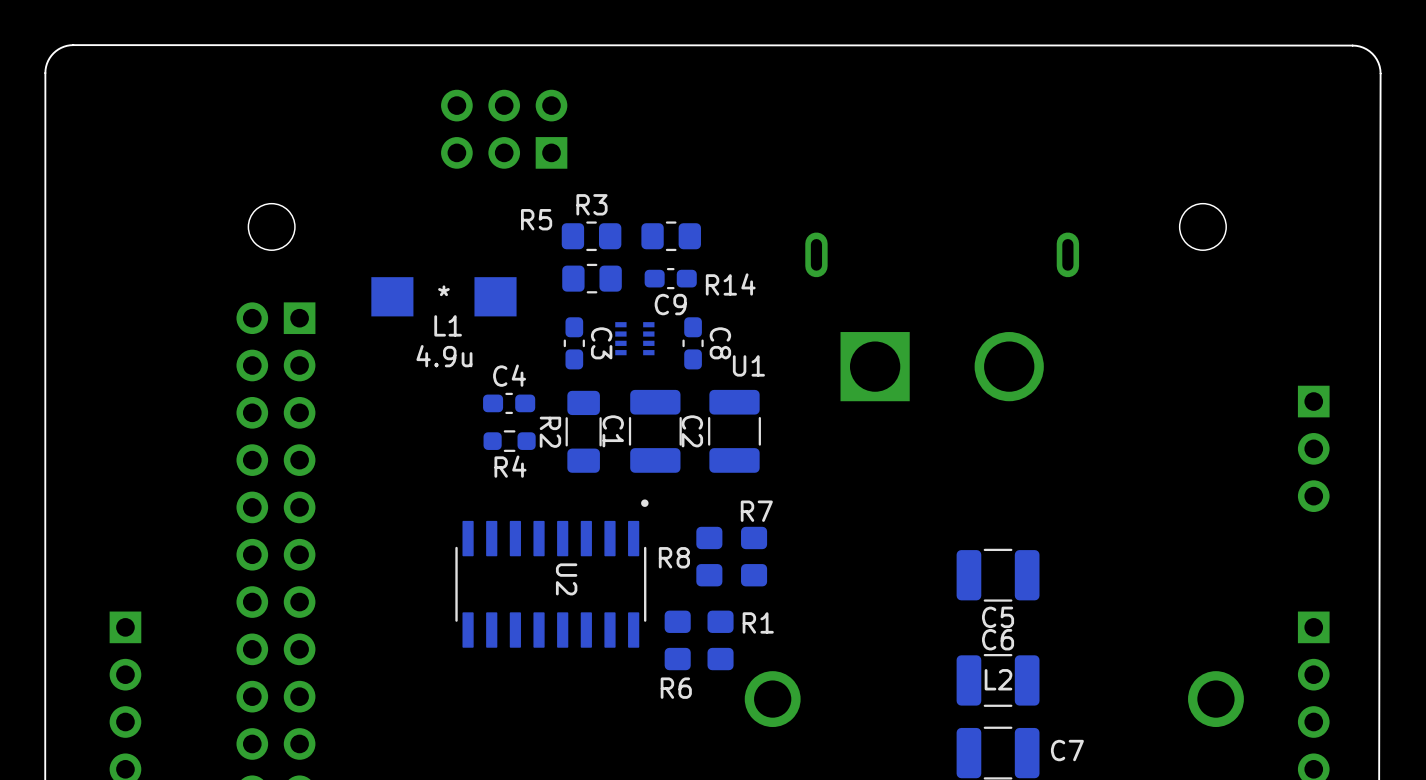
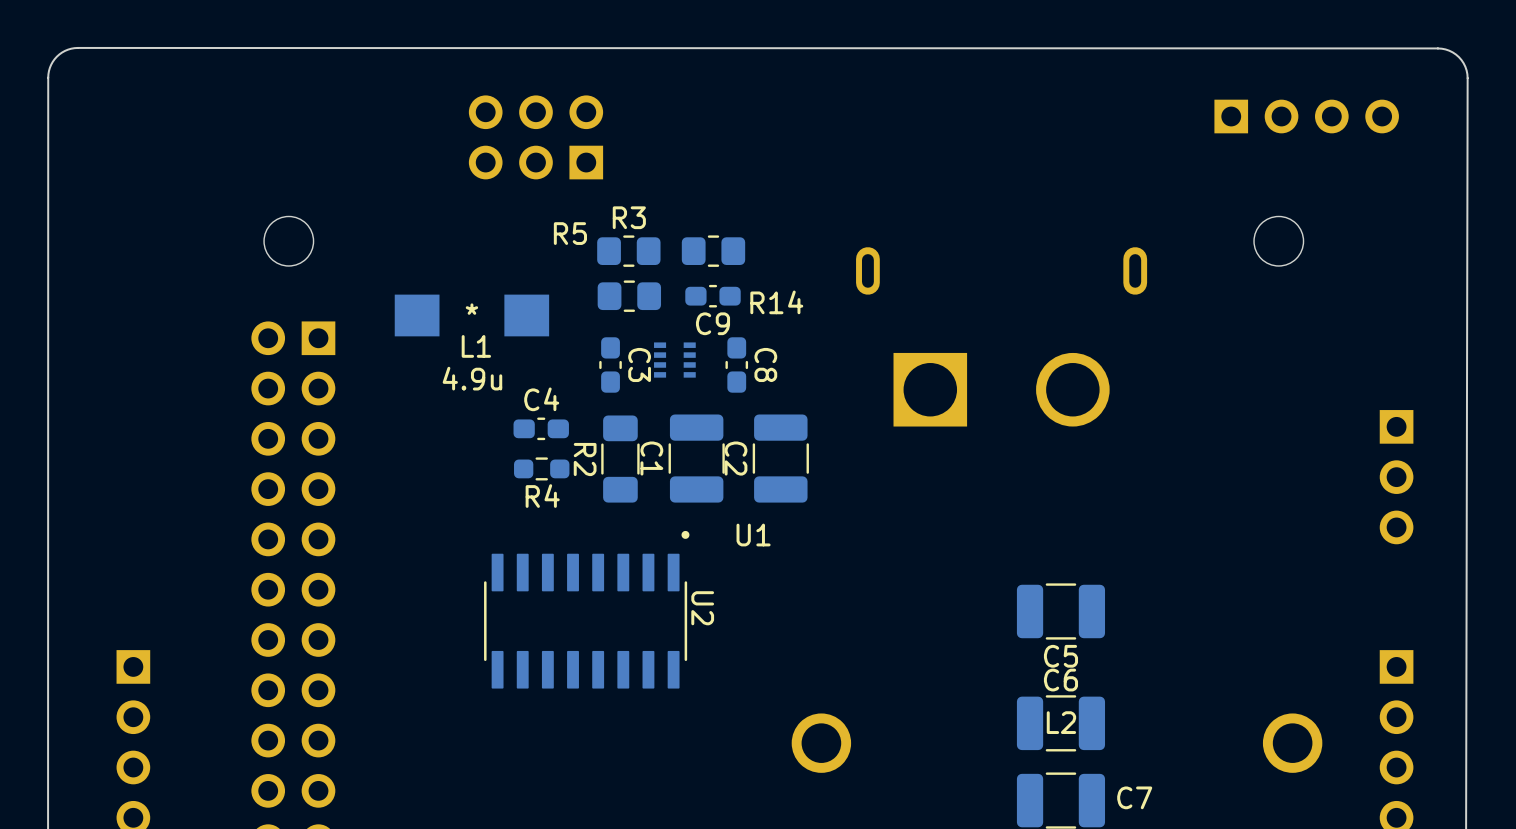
part: none -> (1306, 116)
U1 name position: U1 (748, 365) -> U1 (753, 535)
R8: (709, 556) -> none
R7: (754, 556) -> none
U2 name position: U2 (566, 579) -> U2 (702, 608)
R6: (677, 640) -> none
R1: (720, 640) -> none

